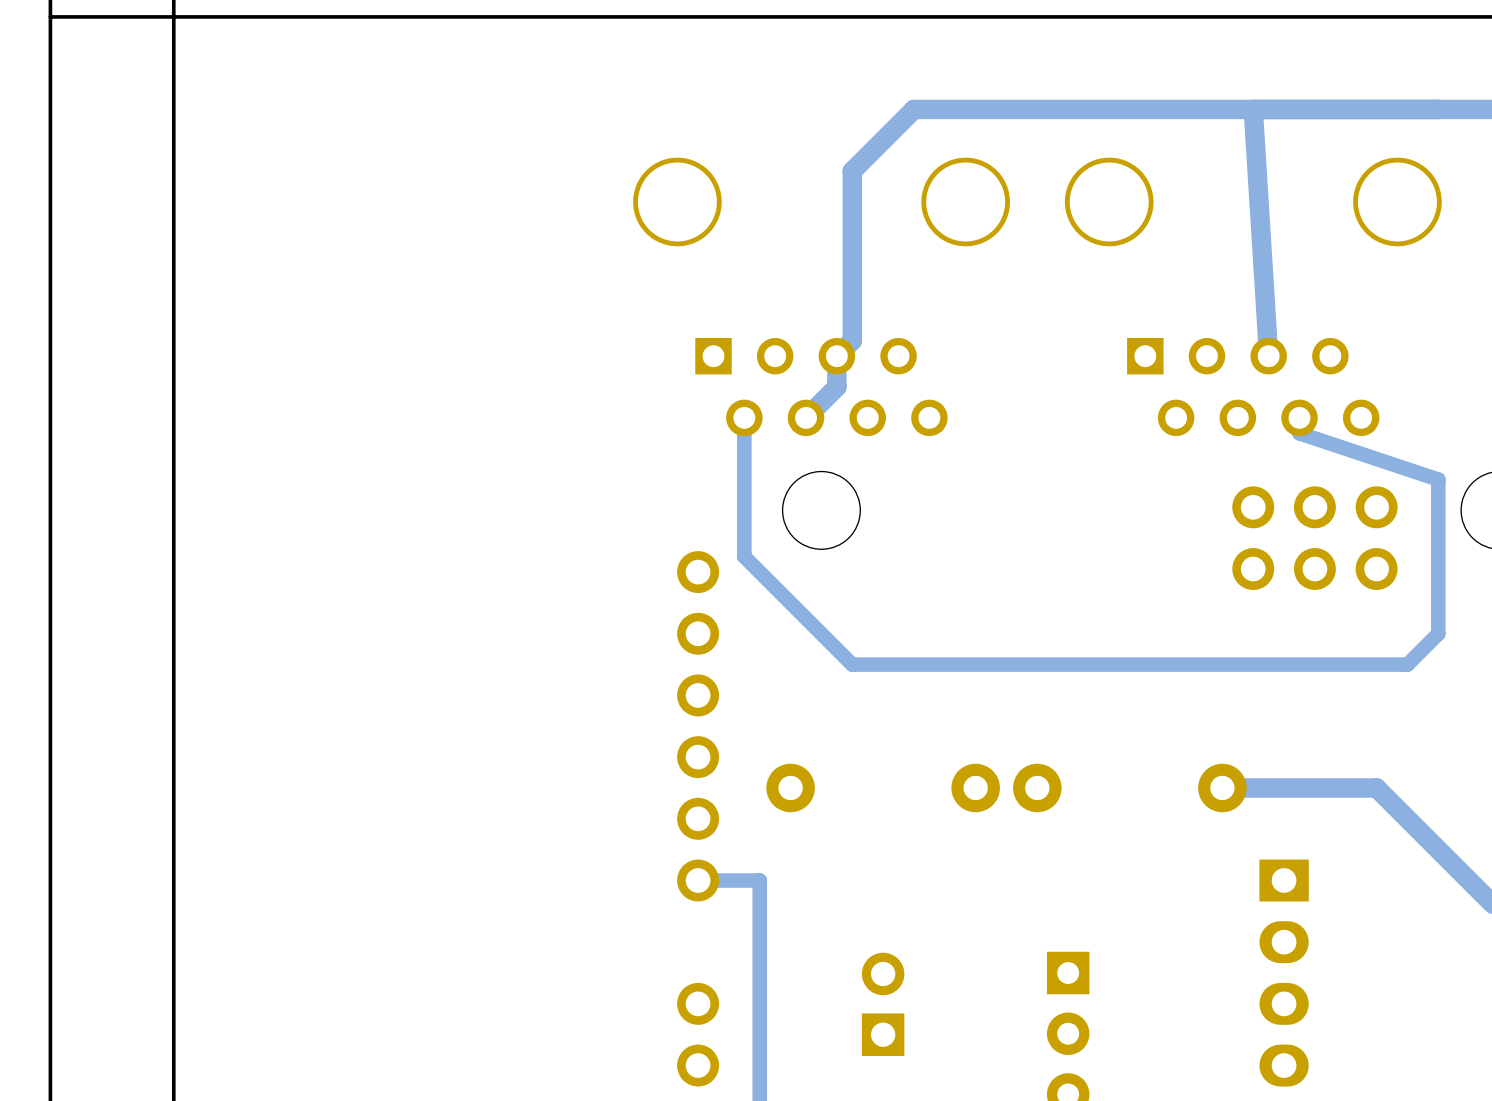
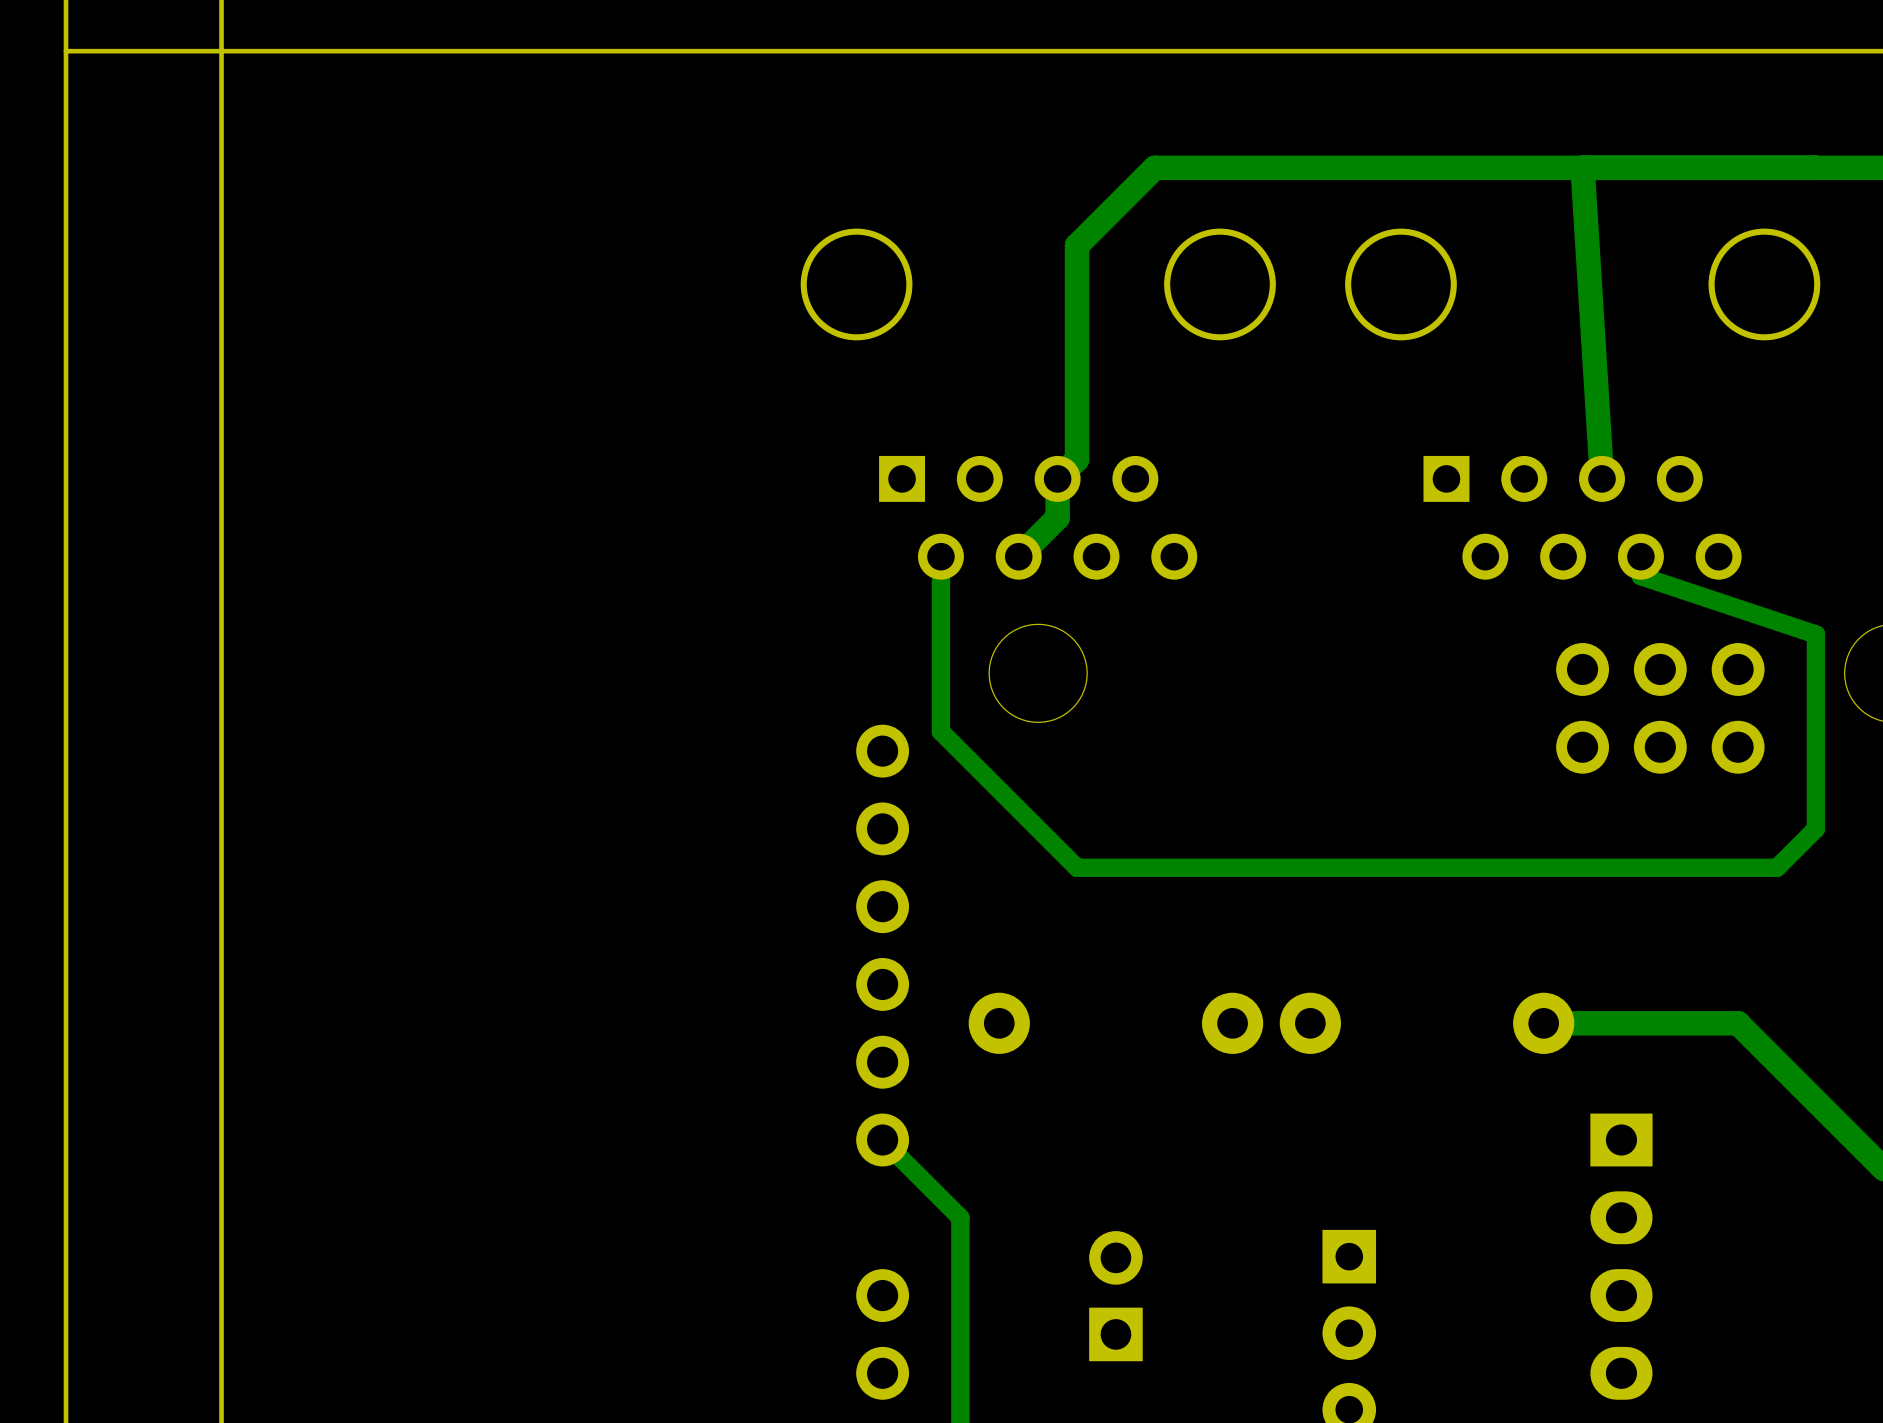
track: (698, 880) (759, 880) (759, 942) -> (882, 1139) (960, 1217)

